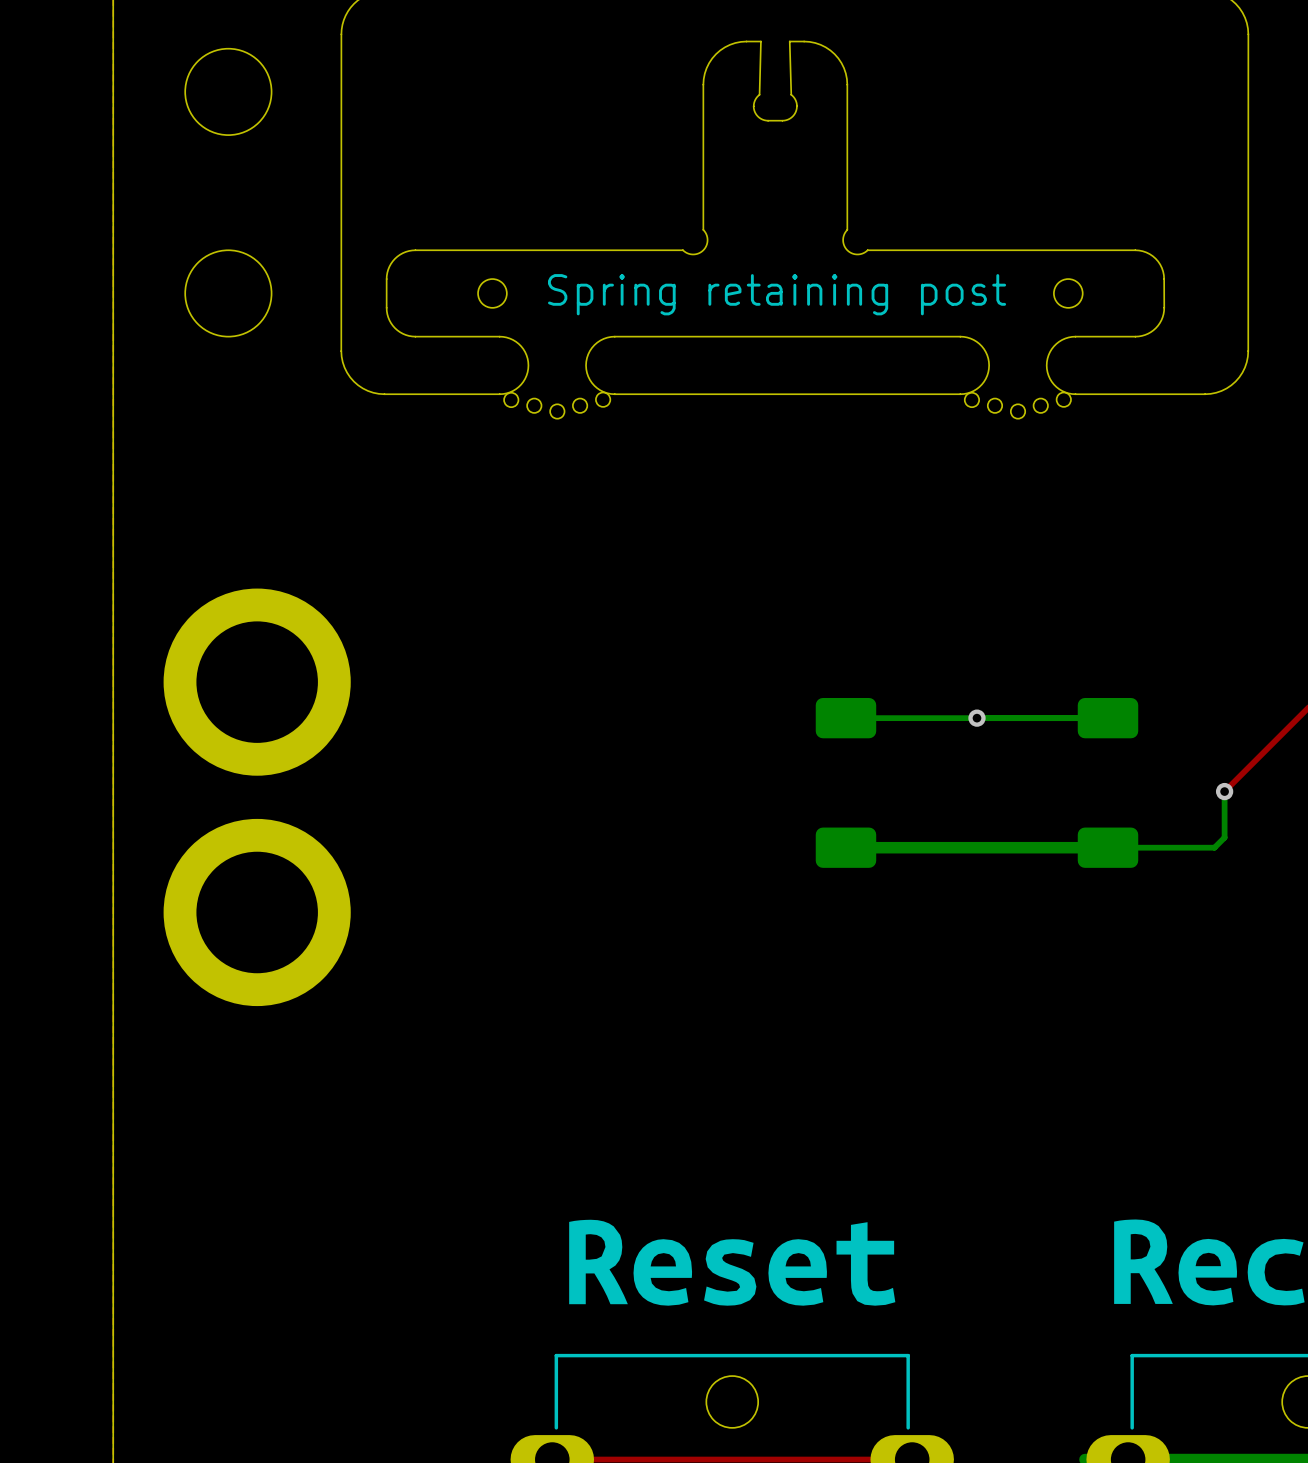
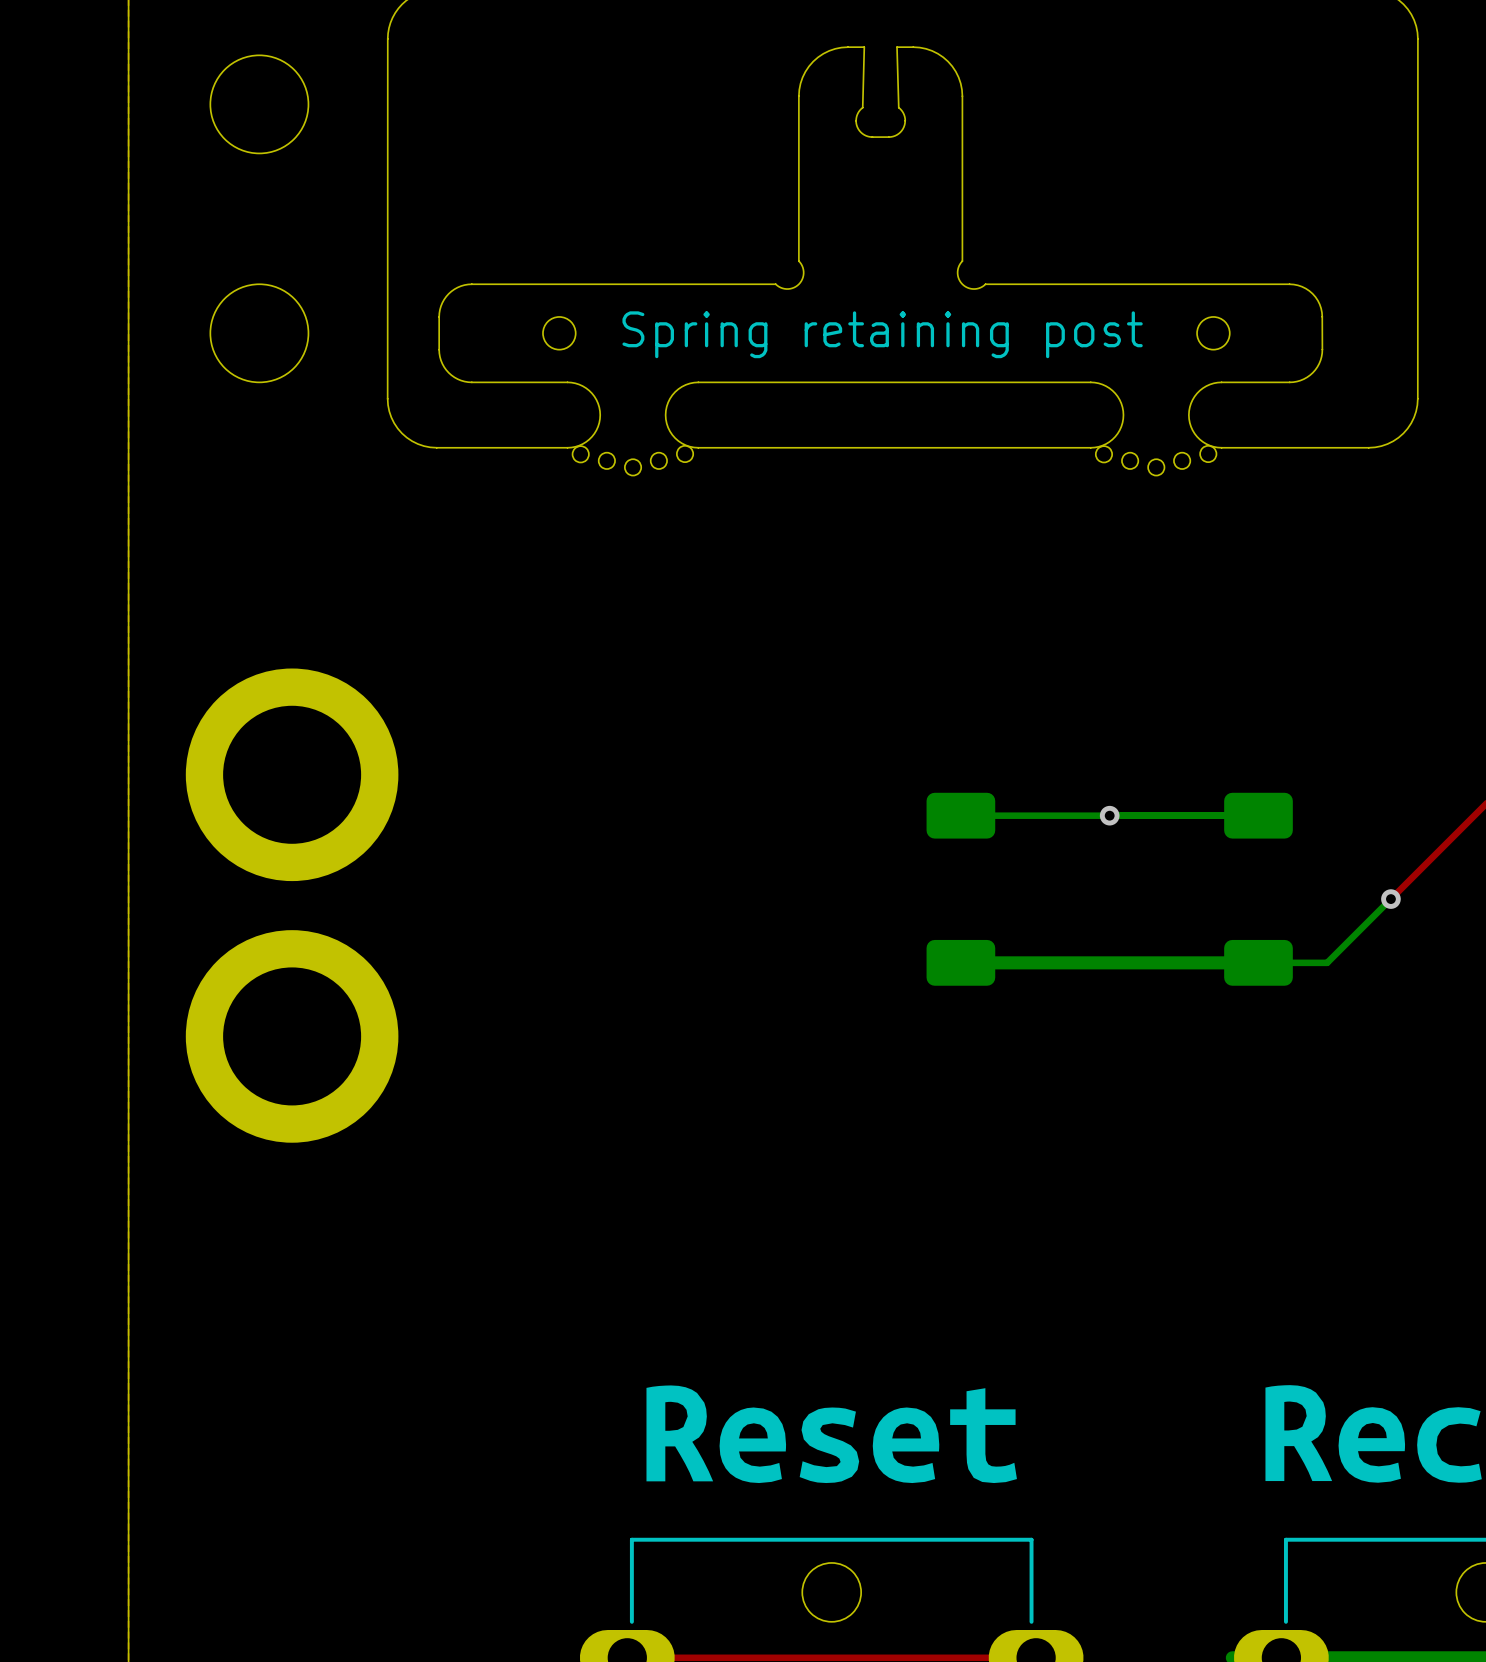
bottom track: (1224, 791) (1224, 837) (1214, 847) (1168, 847) -> (1390, 899) (1327, 962)

